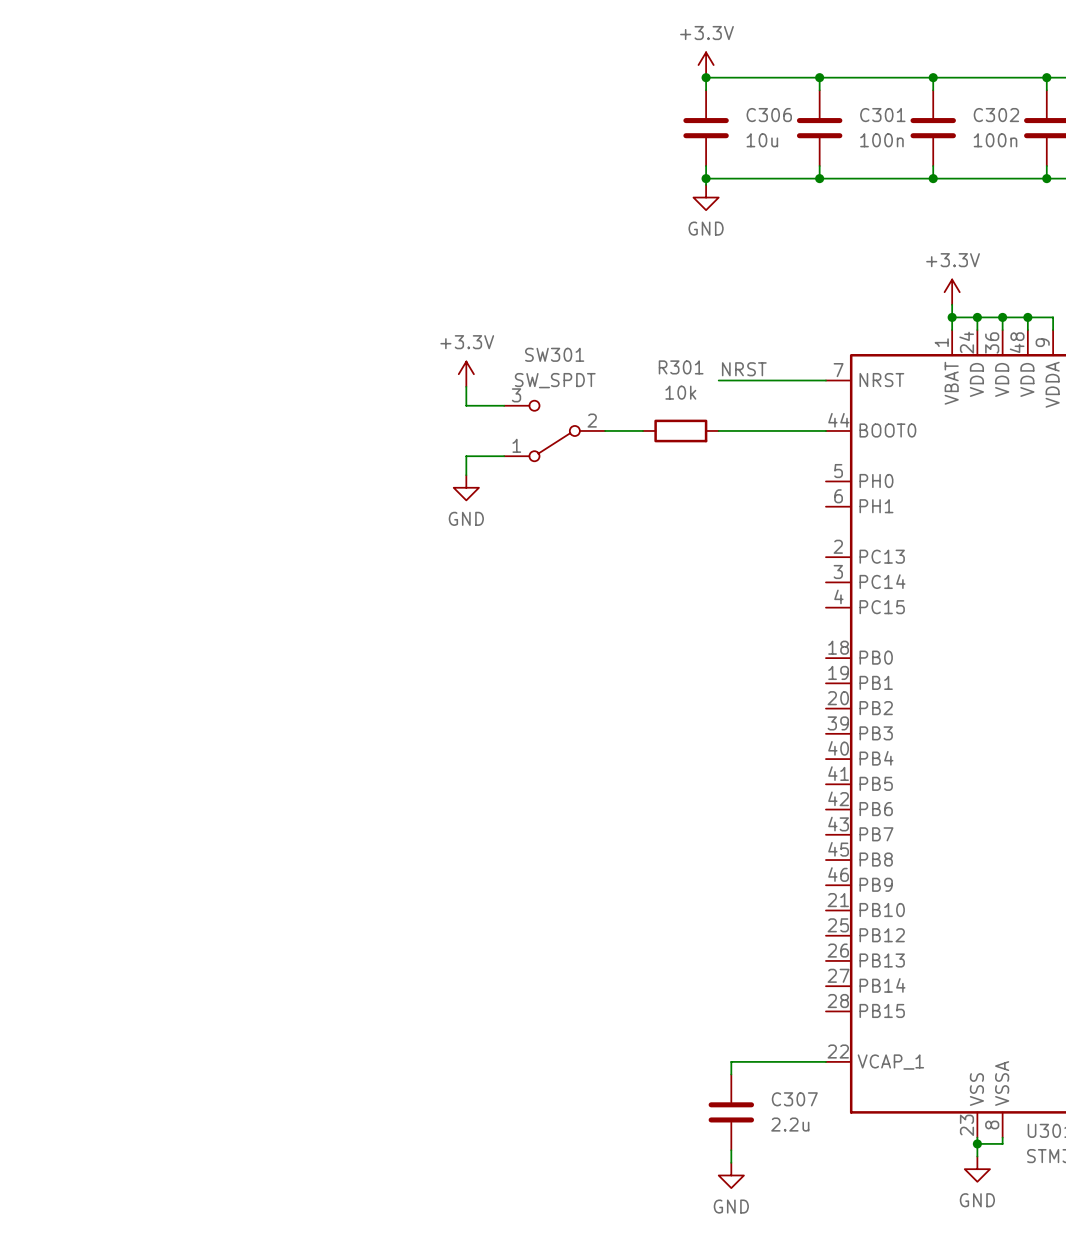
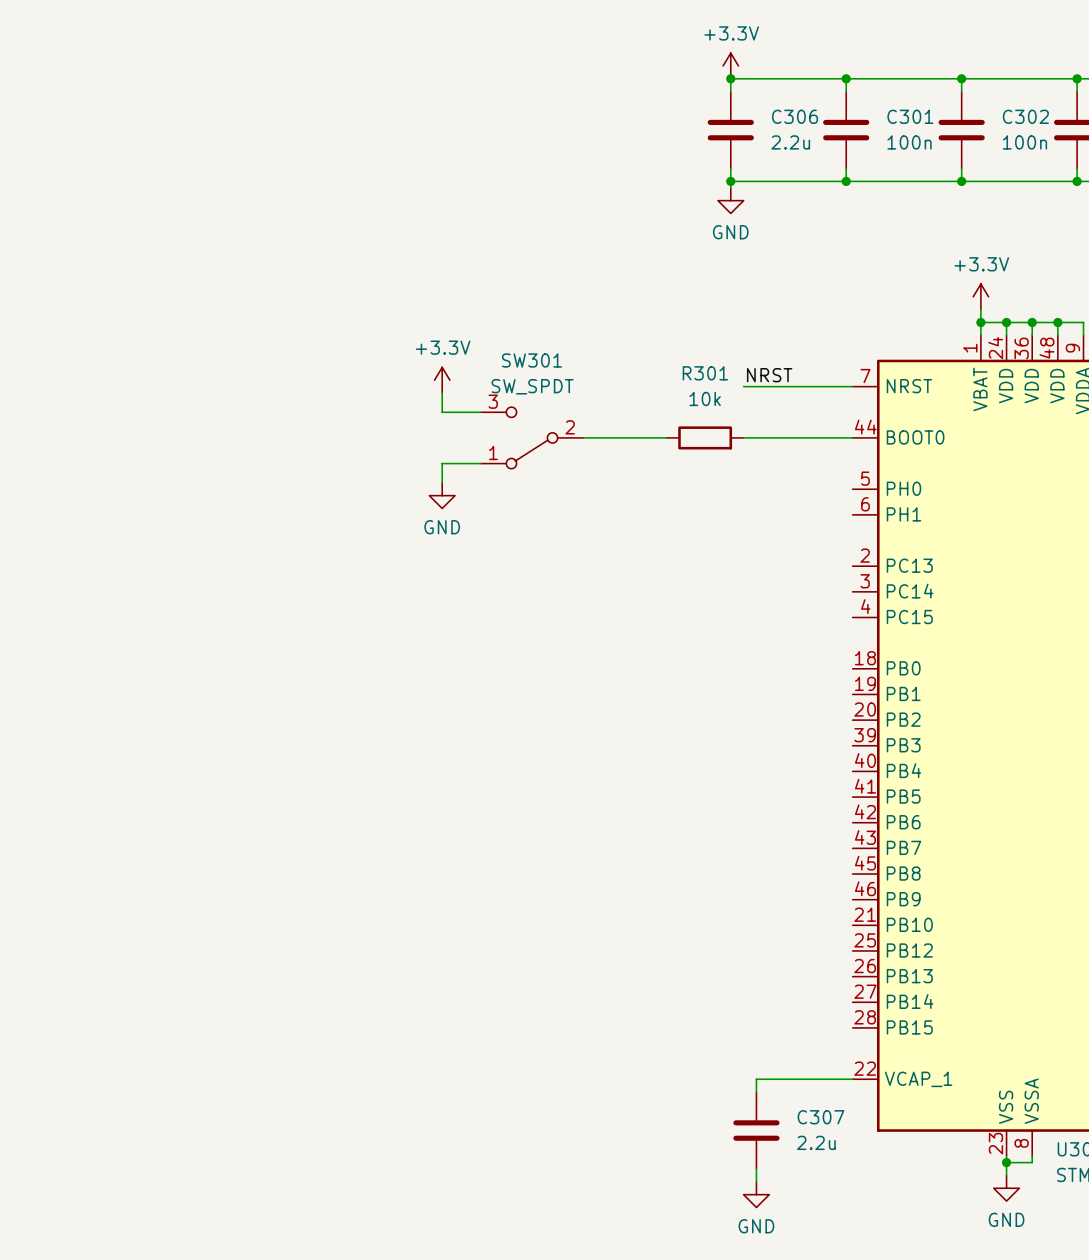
C306 value: 10u (762, 140) -> 2.2u (790, 142)
power symbol position: +3.3V (466, 374) -> +3.3V (442, 380)
wire: (466, 386) (466, 405) (504, 405) -> (442, 393) (442, 412) (480, 412)
SW301 position: (554, 430) -> (531, 437)
wire: (504, 456) (466, 456) (466, 475) -> (480, 463) (442, 463) (442, 482)
power symbol position: GND (466, 487) -> GND (442, 495)

